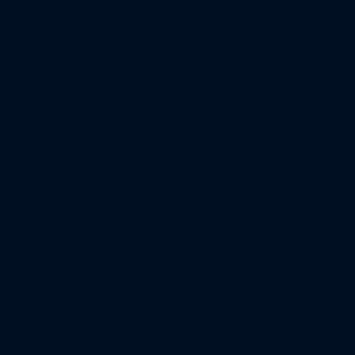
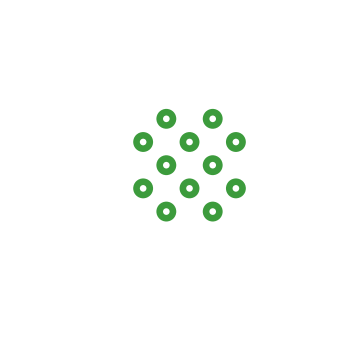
part: none -> (189, 165)

